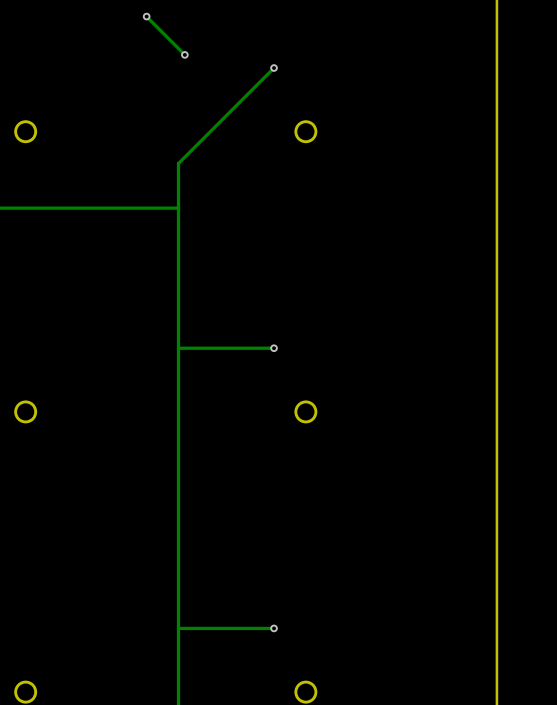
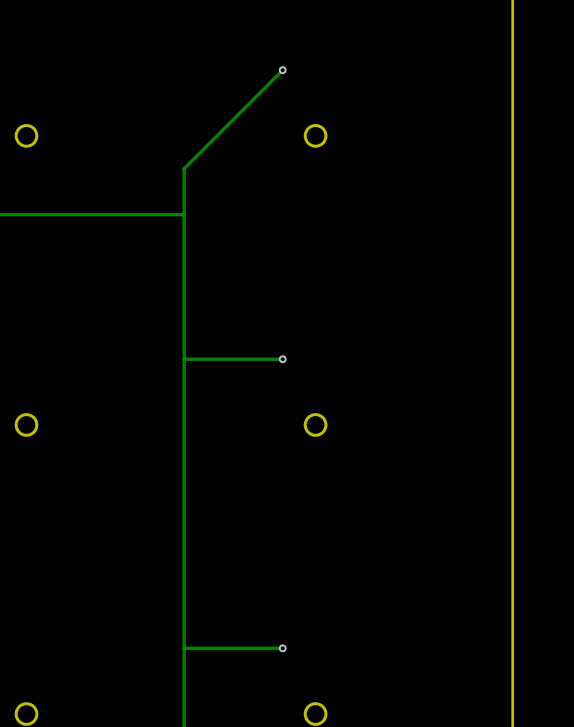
track: (146, 16) (184, 54) -> none
via: (146, 16) -> none
via: (184, 54) -> none

